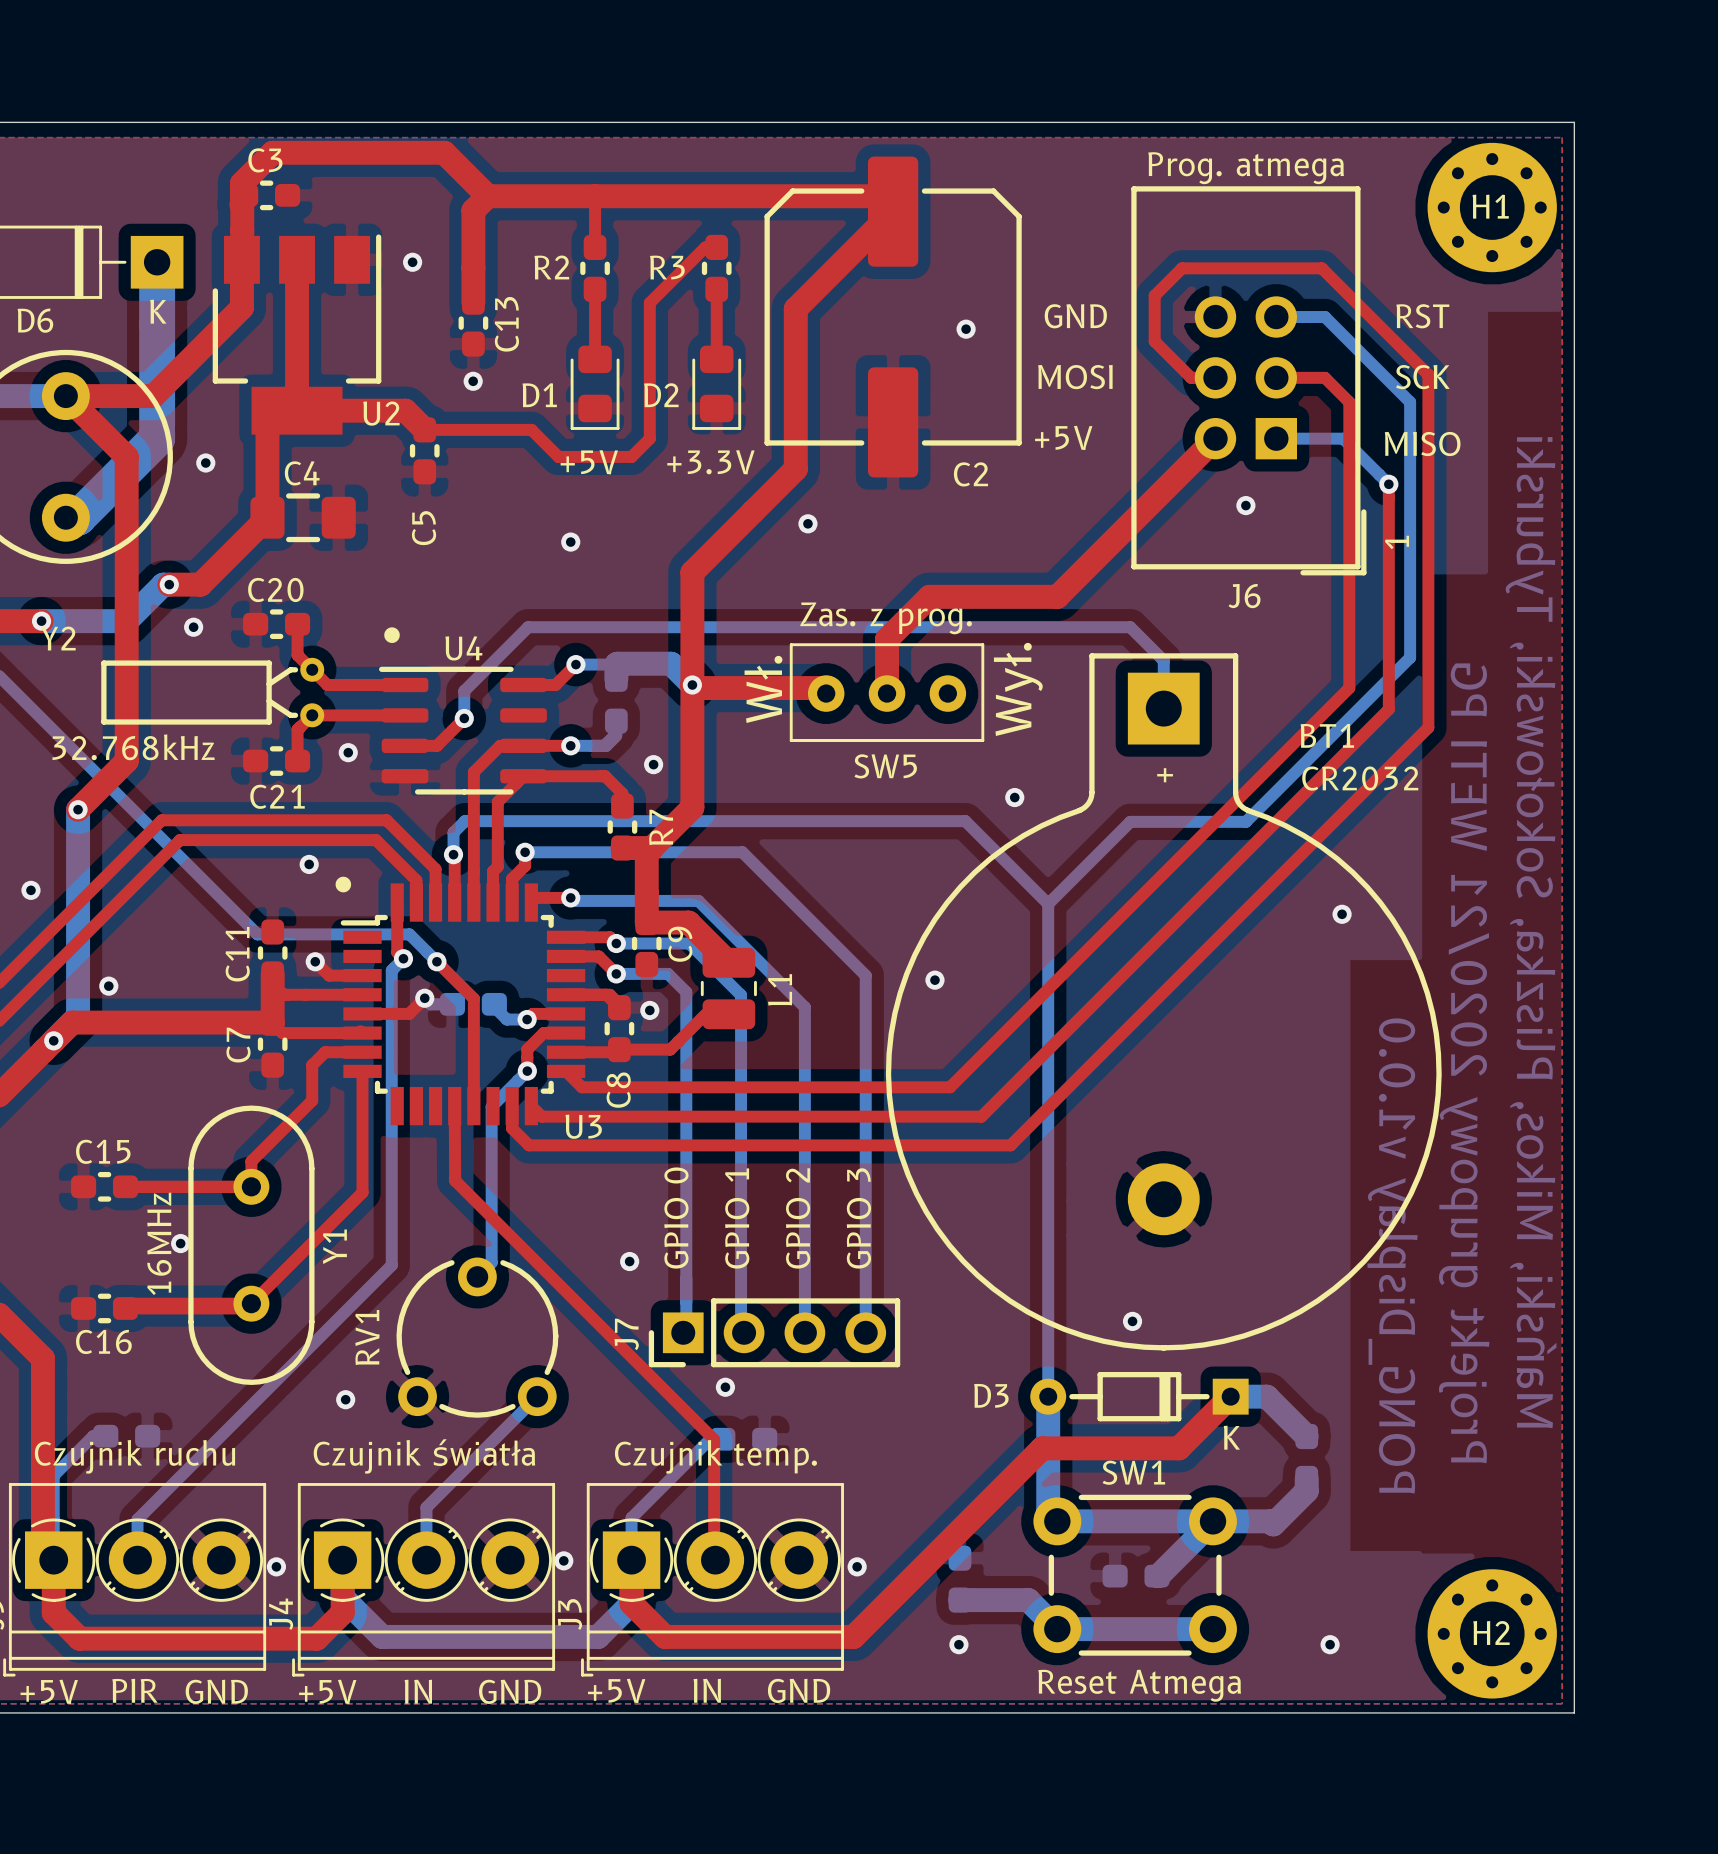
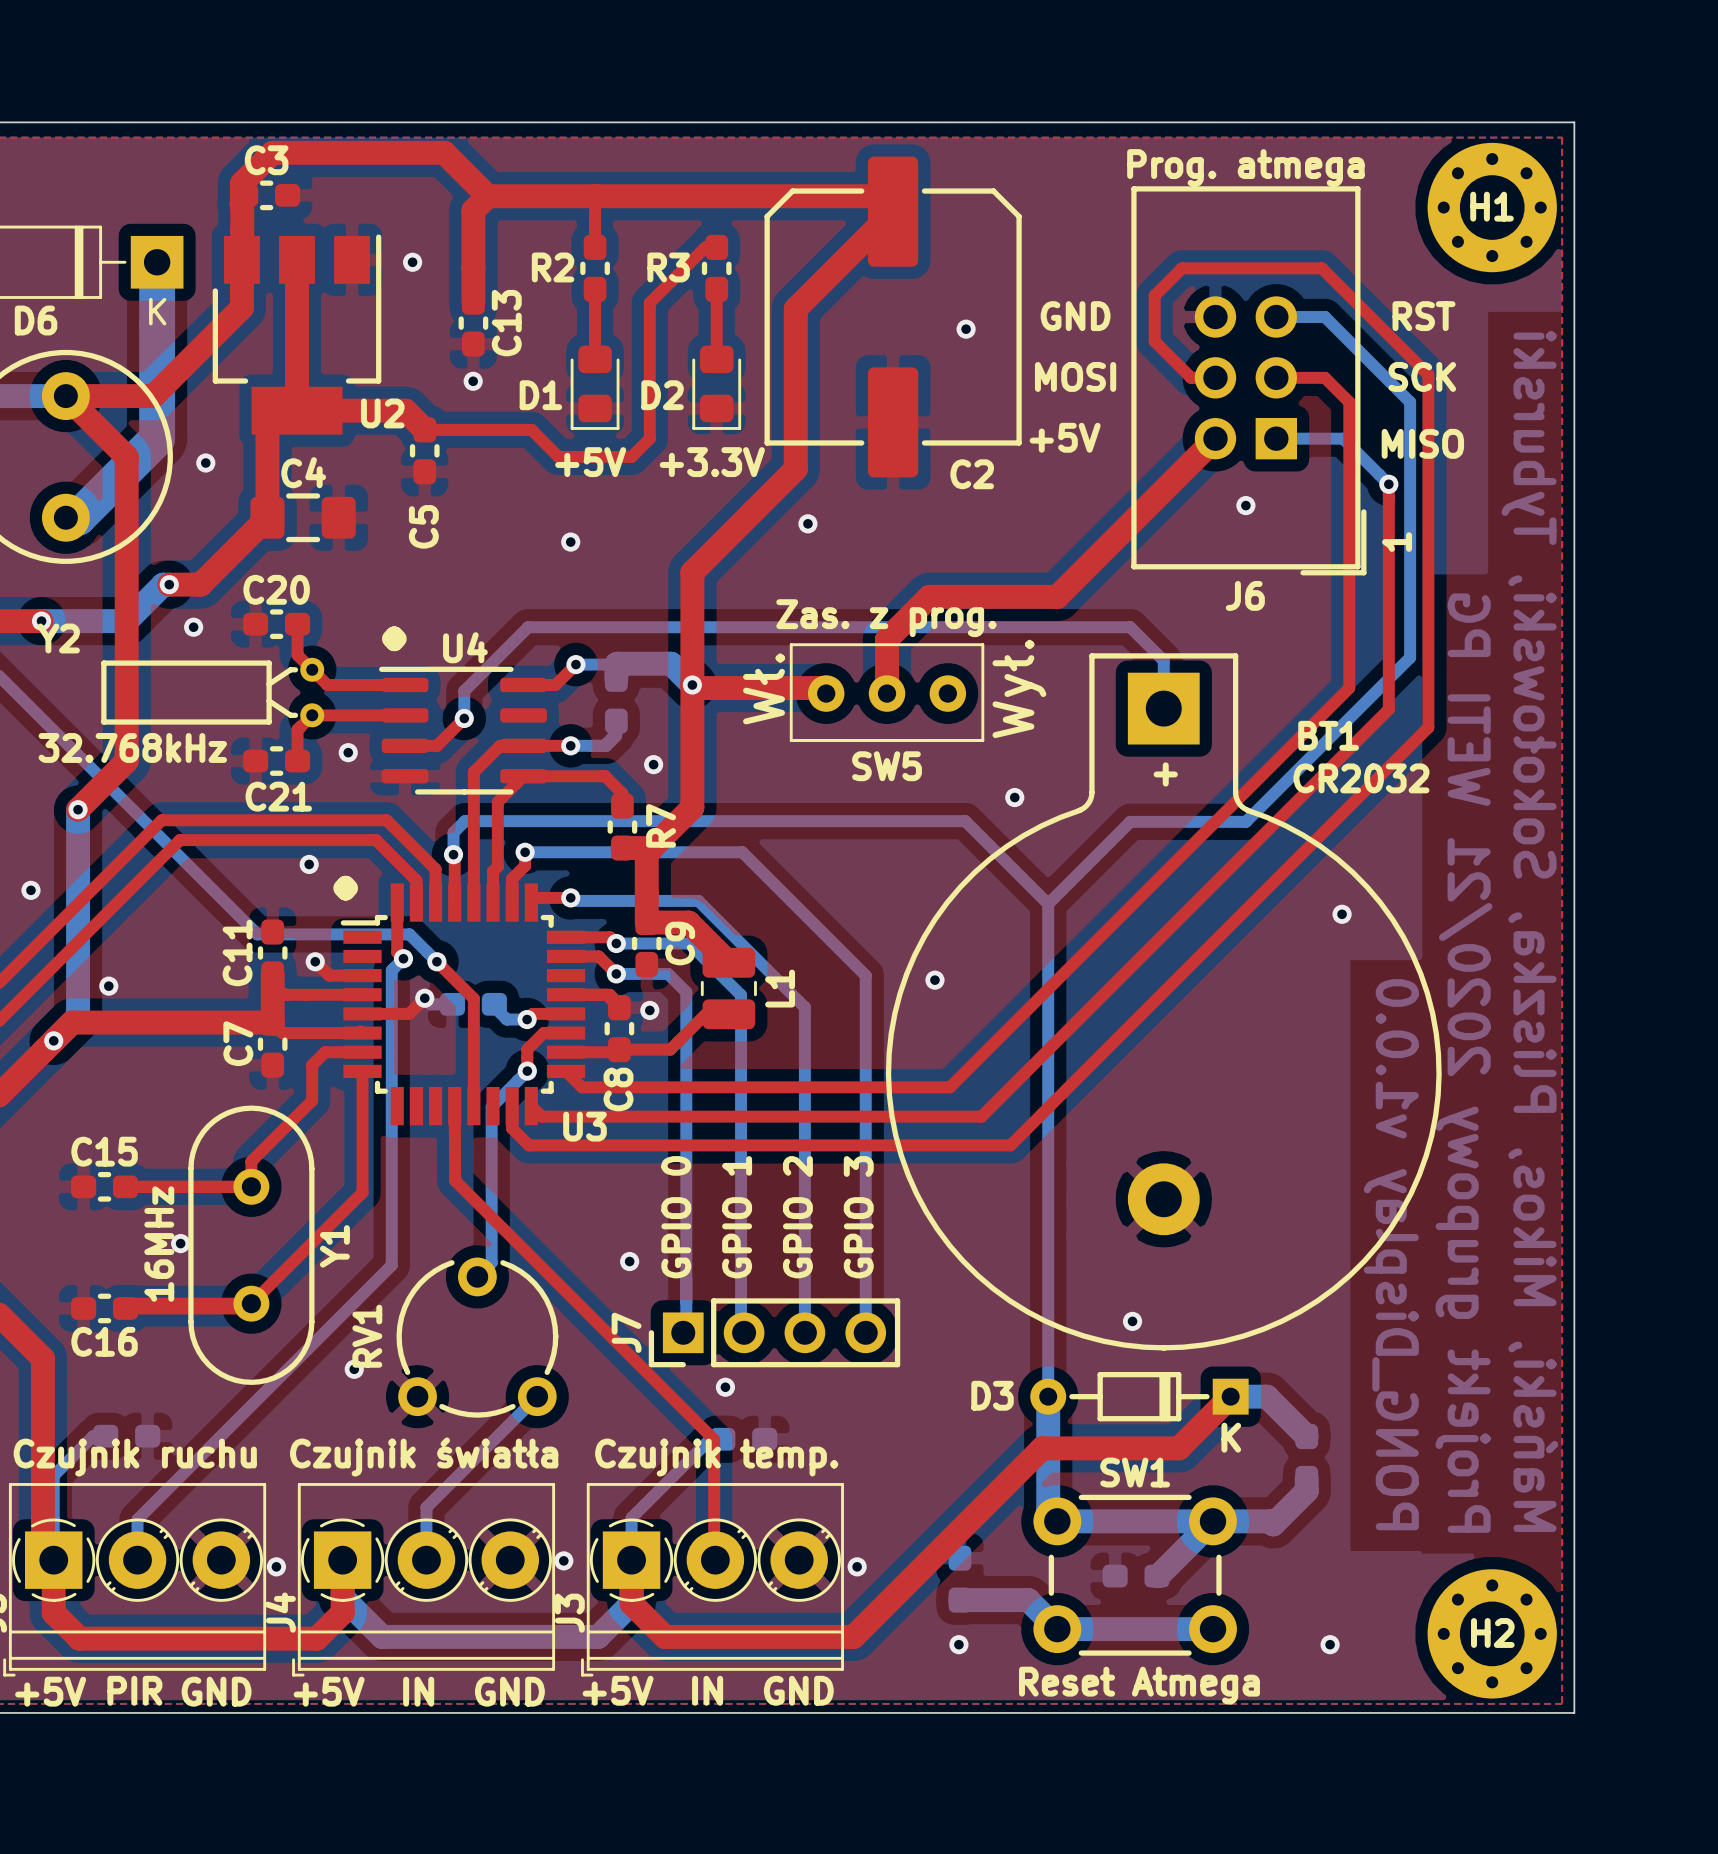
via position: (345, 1399) -> (354, 1369)

